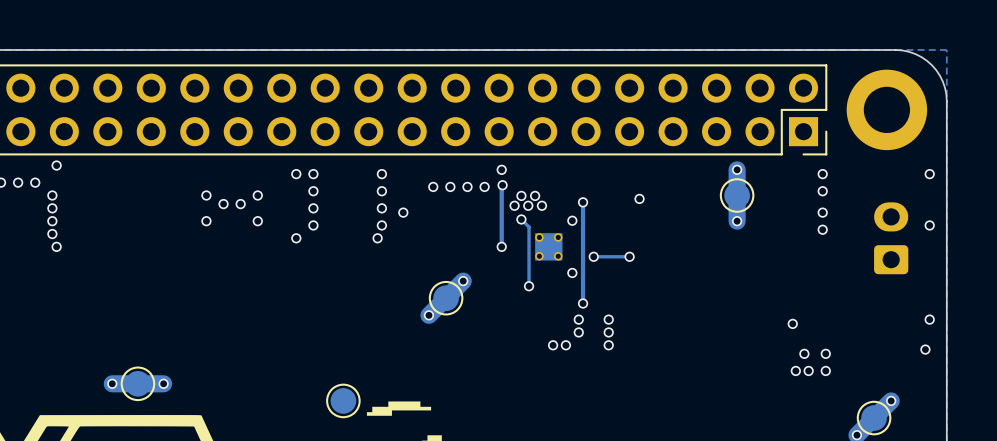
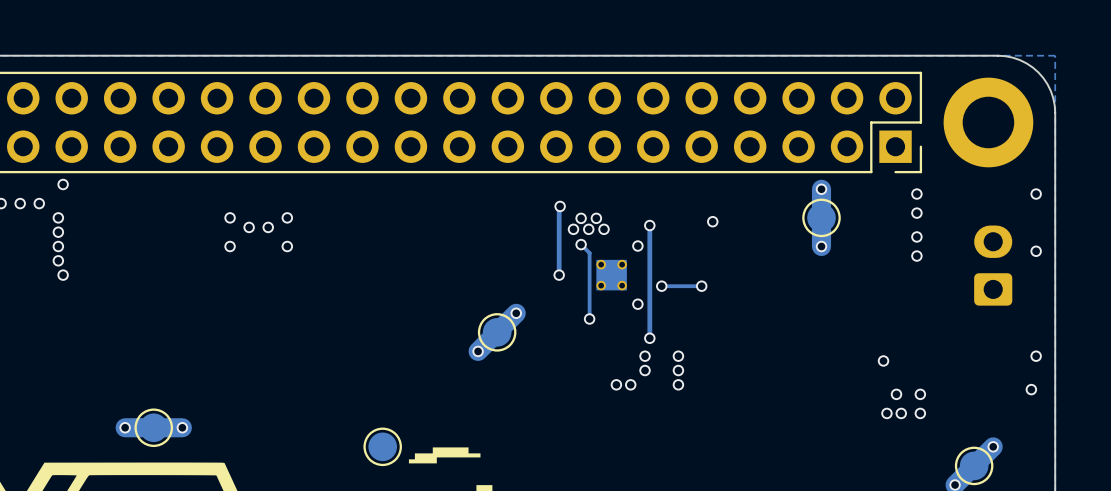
via: (501, 169) -> none
via: (296, 174) -> none
via: (313, 174) -> none
via: (381, 174) -> none
via: (433, 186) -> none
via: (450, 186) -> none
via: (467, 186) -> none
via: (484, 186) -> none
via: (313, 191) -> none
via: (381, 191) -> none
via: (313, 208) -> none
via: (381, 208) -> none
via: (403, 212) -> none
via: (313, 225) -> none
via: (381, 225) -> none
via: (296, 238) -> none
via: (377, 238) -> none

